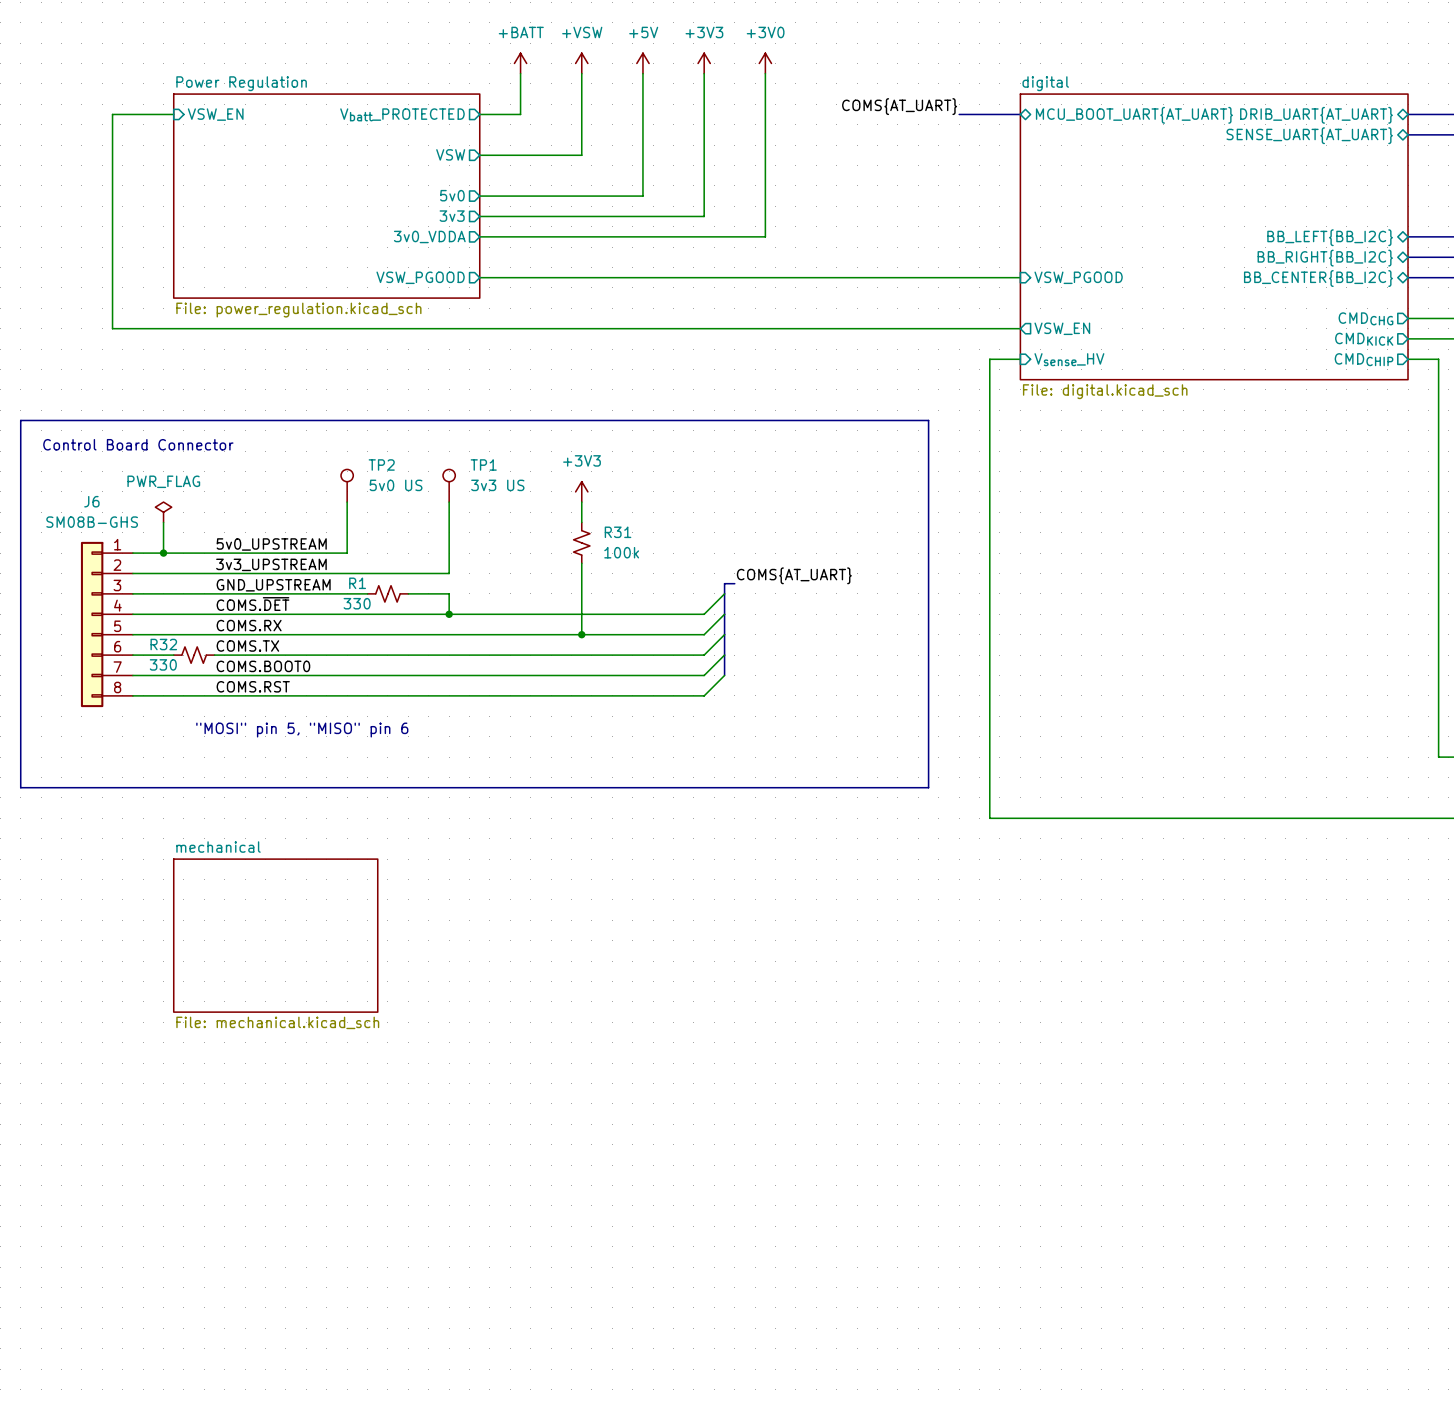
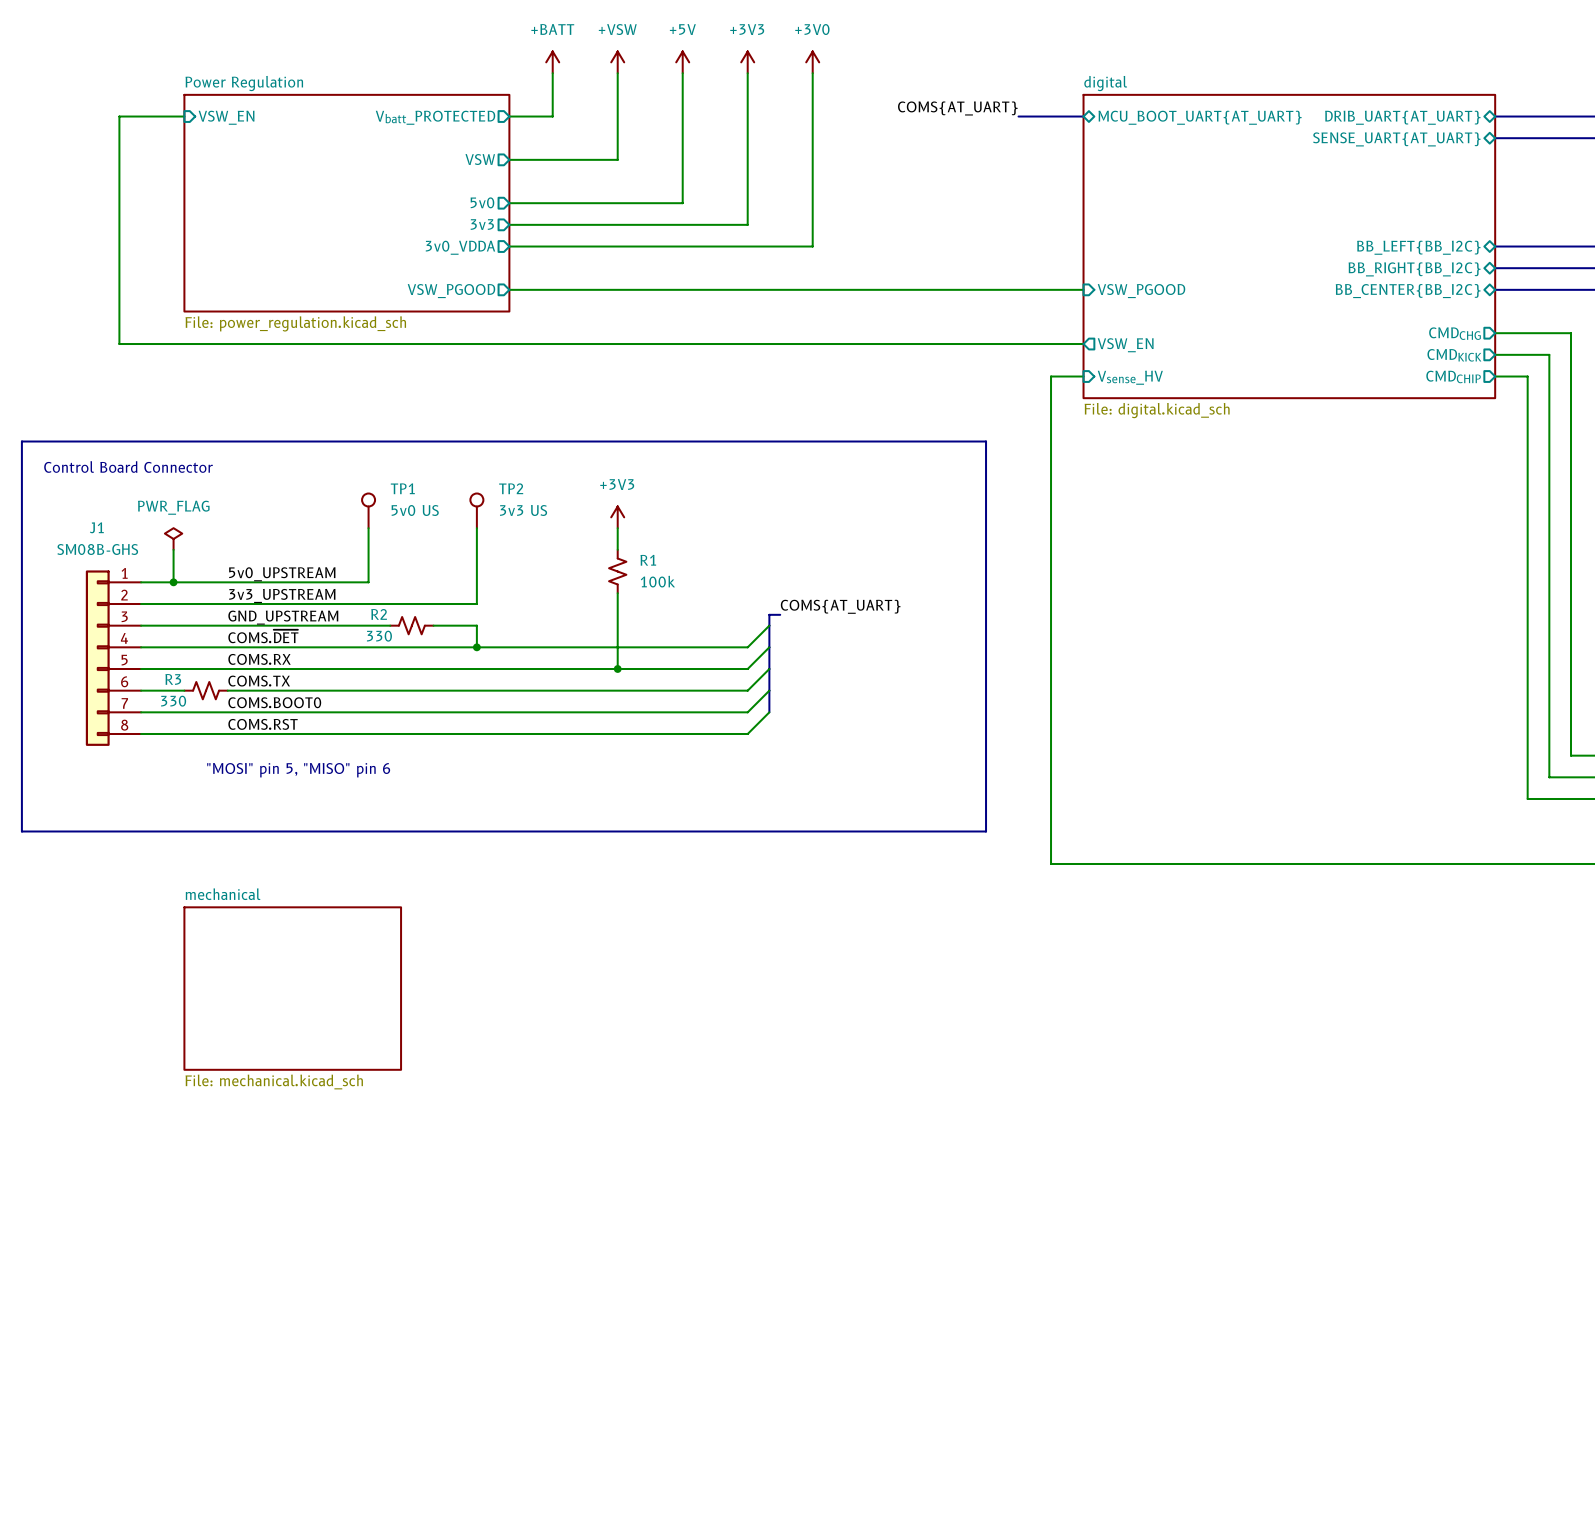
TP2 name: TP2 (381, 464) -> TP1 (402, 488)
TP1 name: TP1 (483, 464) -> TP2 (511, 488)
J6 name: J6 (91, 501) -> J1 (96, 527)
R31 name: R31 (618, 532) -> R1 (648, 560)
R1 name: R1 (357, 583) -> R2 (379, 614)
R32 name: R32 (163, 644) -> R3 (173, 679)

